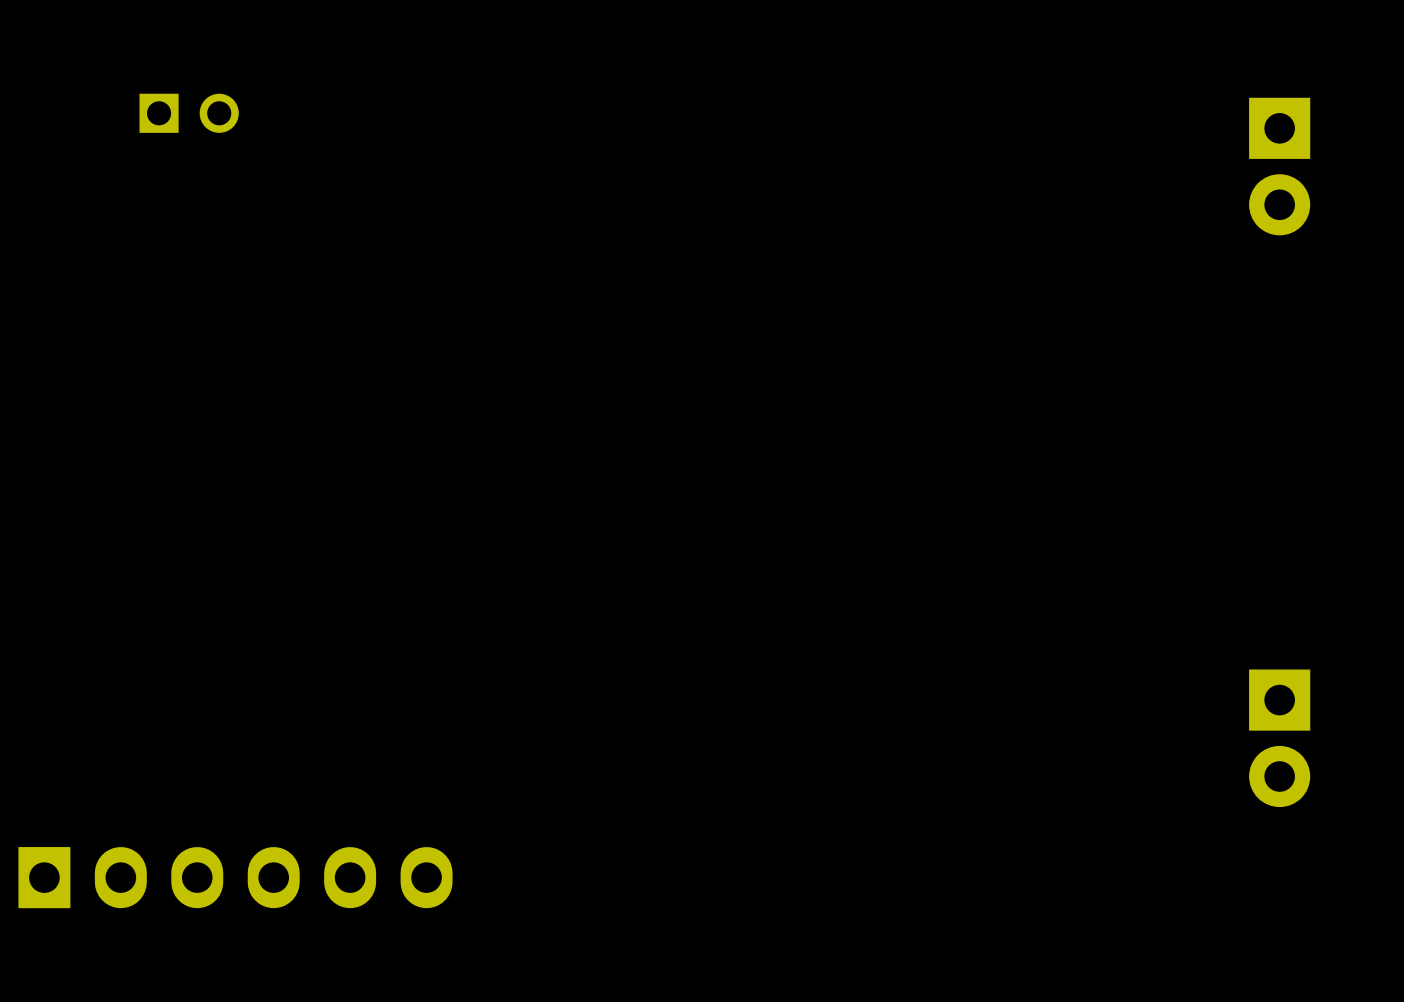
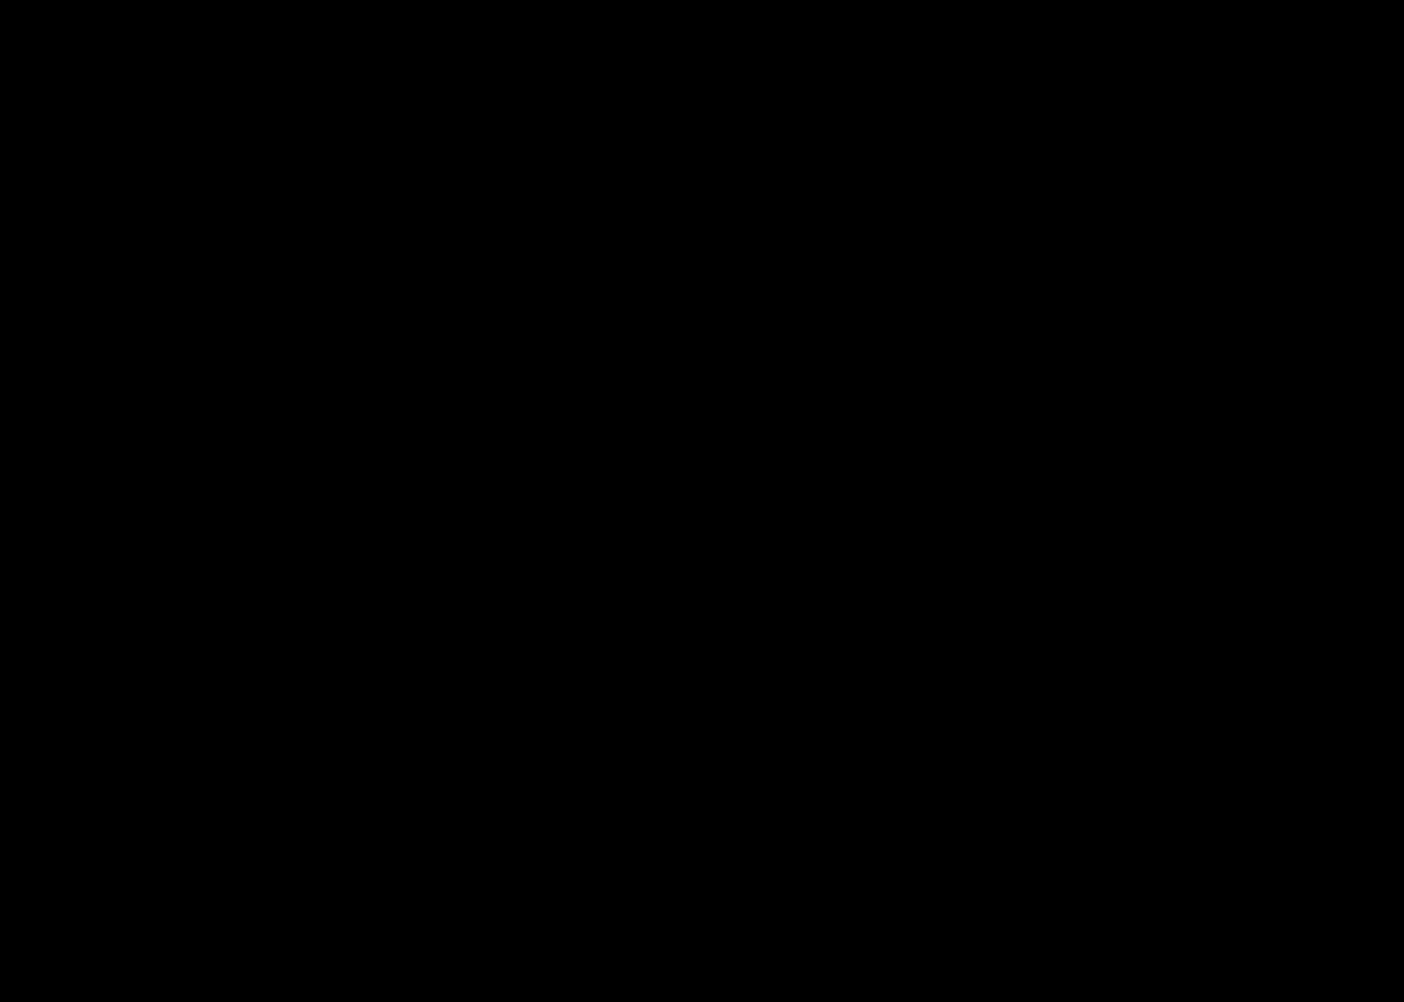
part: (189, 113) -> none
part: (1279, 166) -> none
part: (1279, 738) -> none
part: (235, 877) -> none

